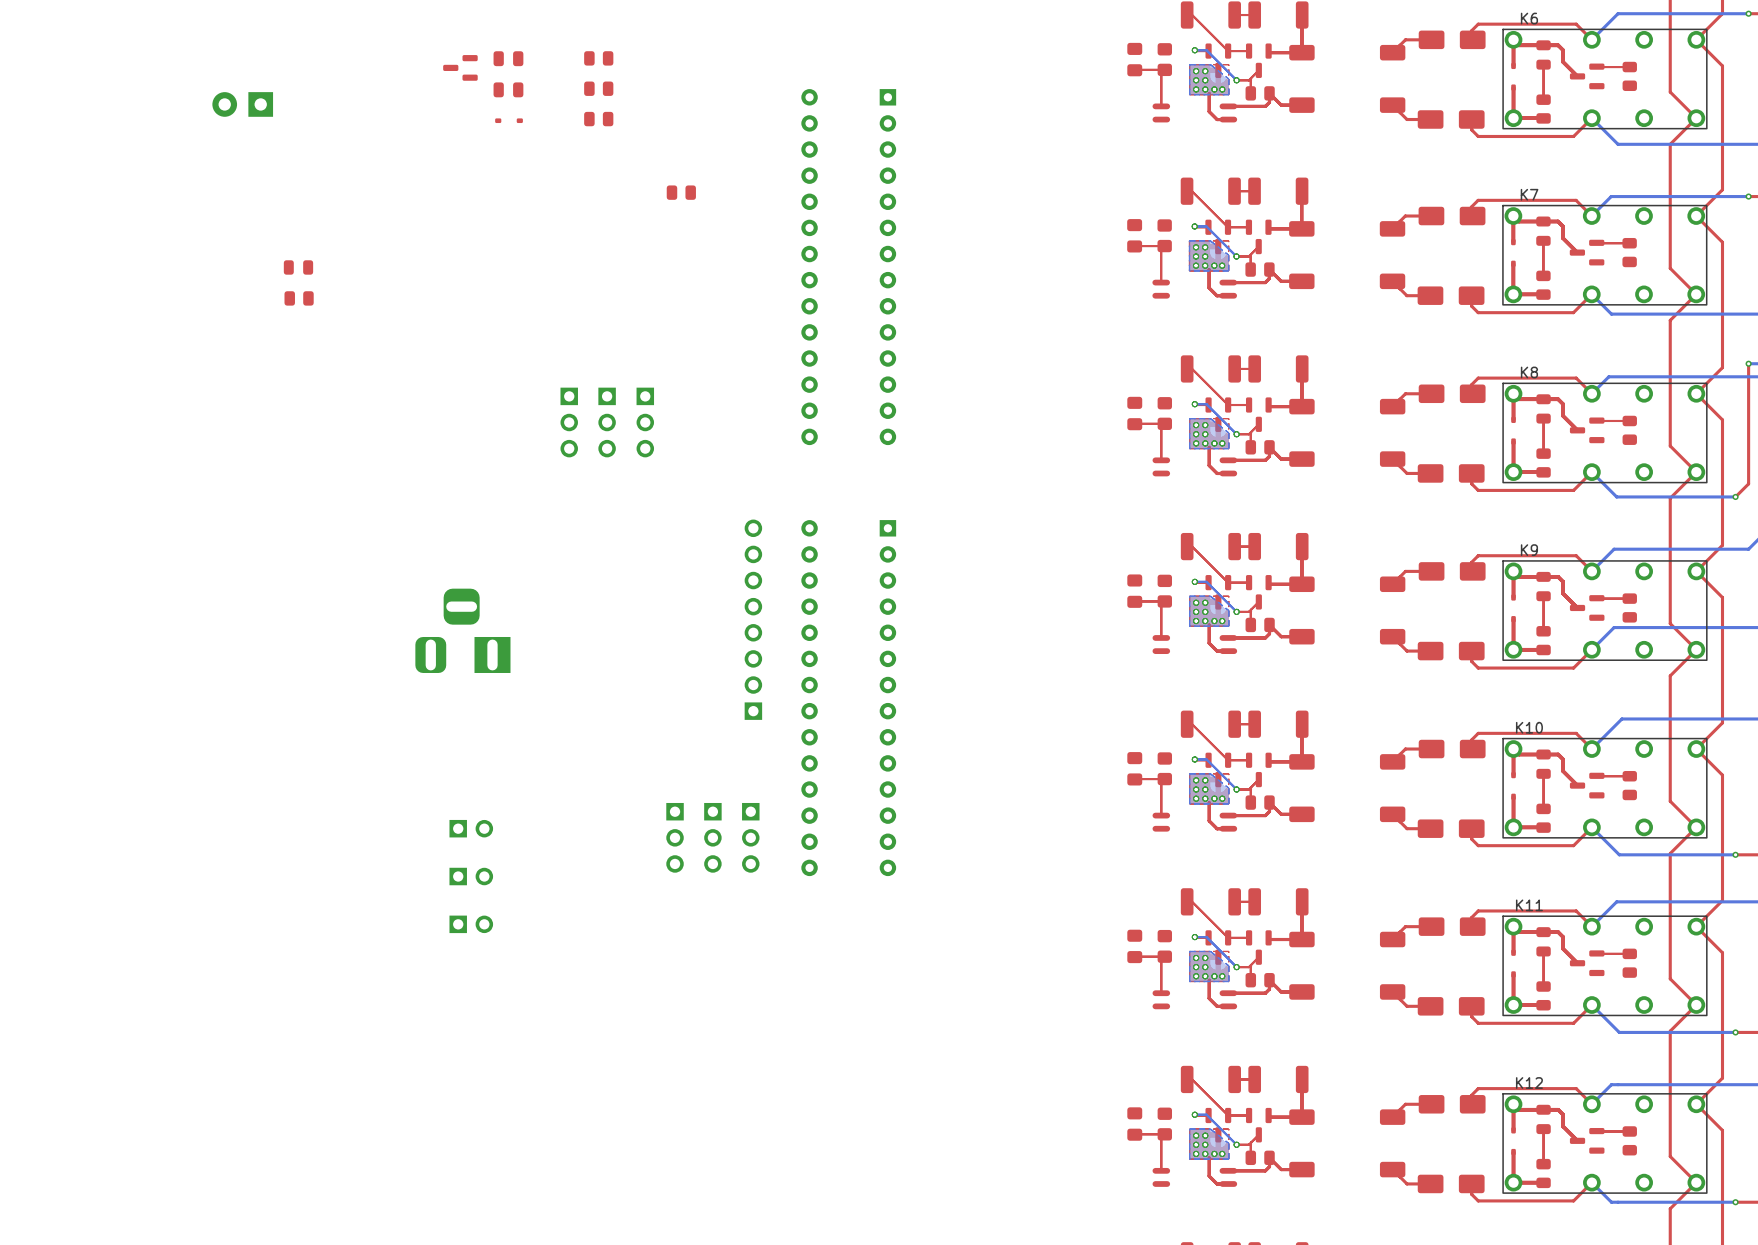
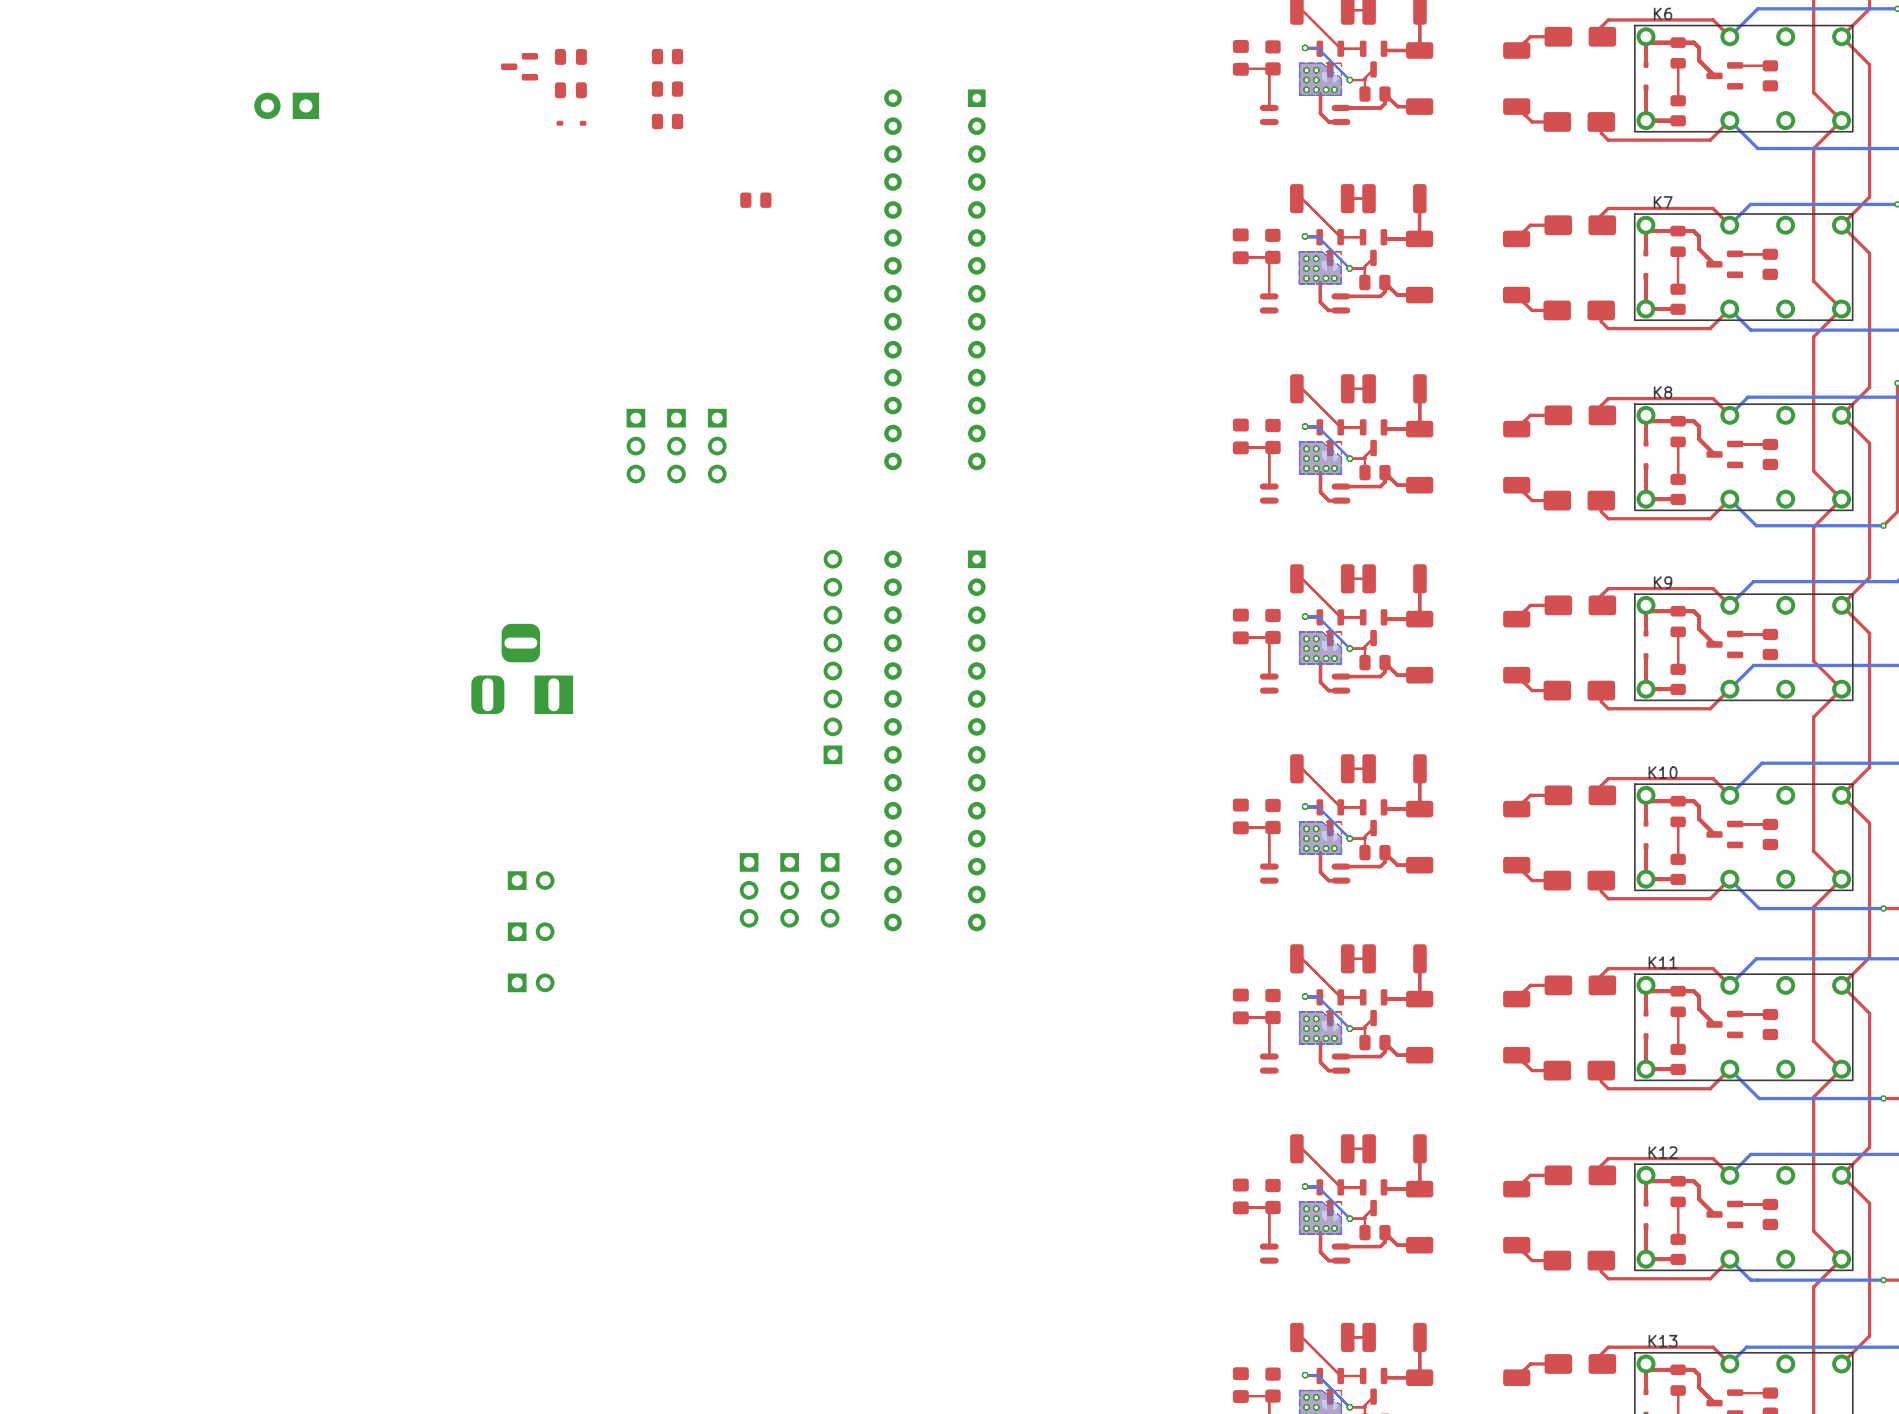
part: (298, 267) -> none
part: (299, 298) -> none

